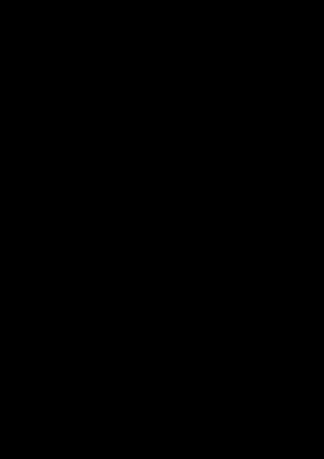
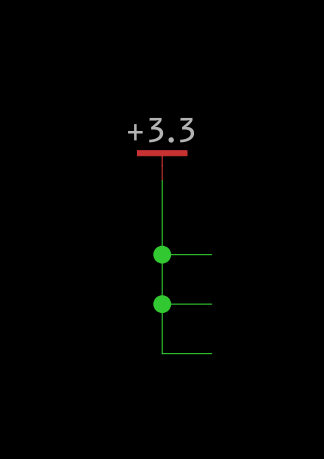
power symbol: none -> +3.3 (162, 165)
wire: none -> (162, 180) (162, 353) (211, 353)
wire: none -> (162, 254) (211, 254)
junction: none -> (162, 254)
wire: none -> (162, 304) (211, 304)
junction: none -> (162, 304)

